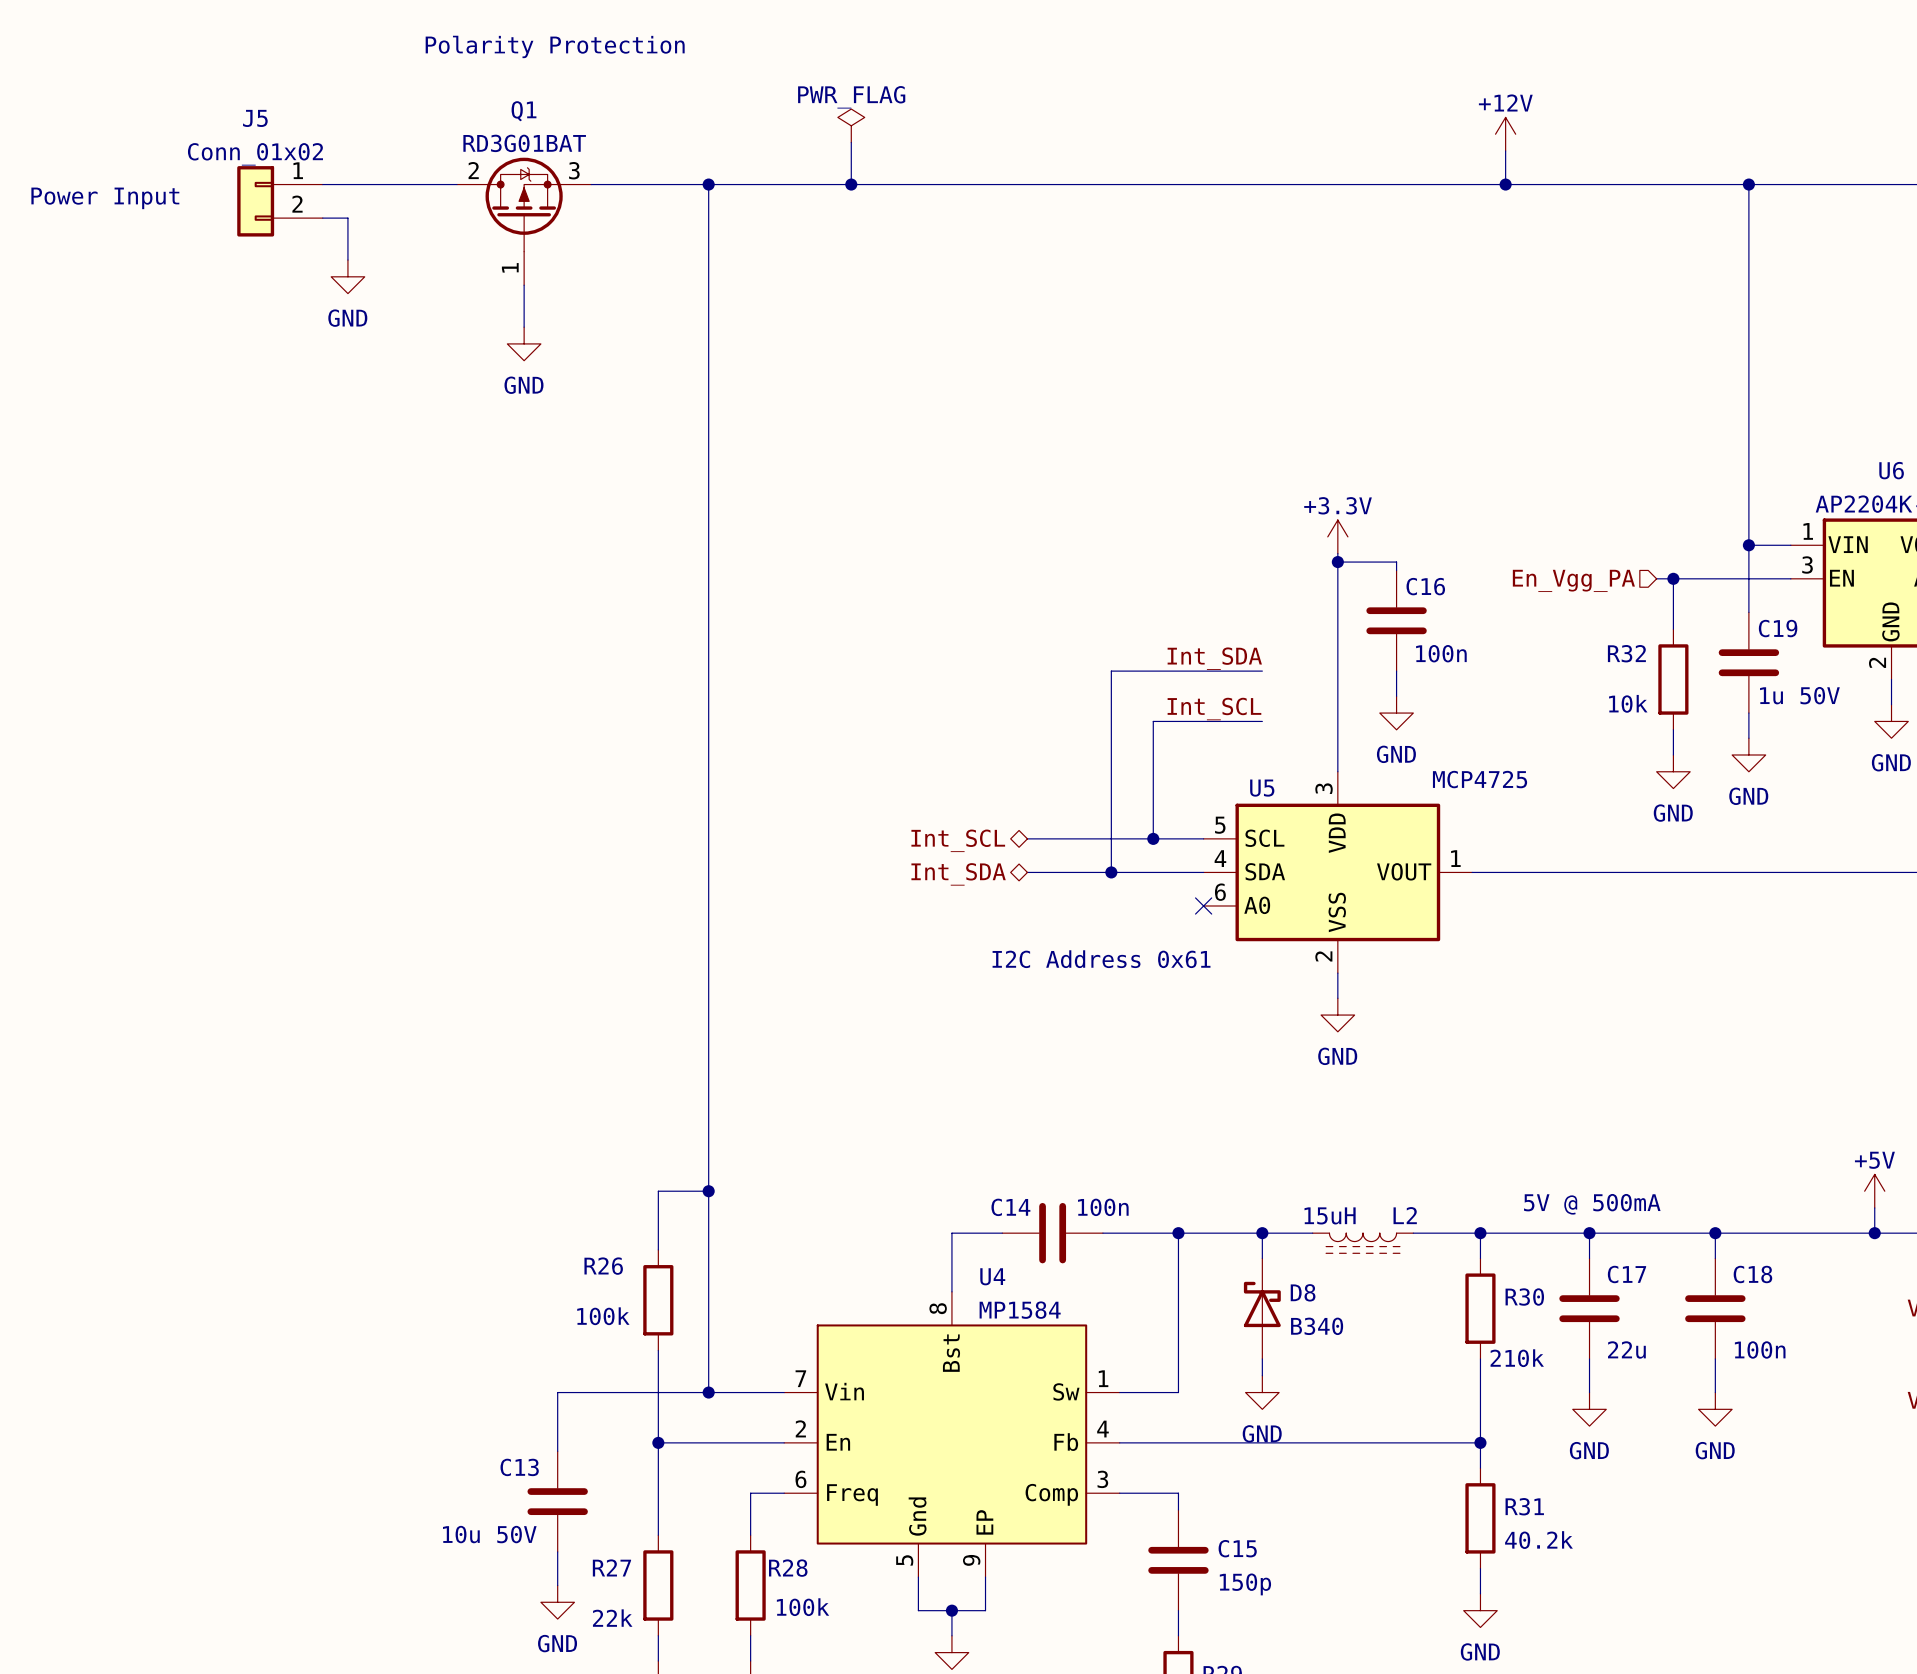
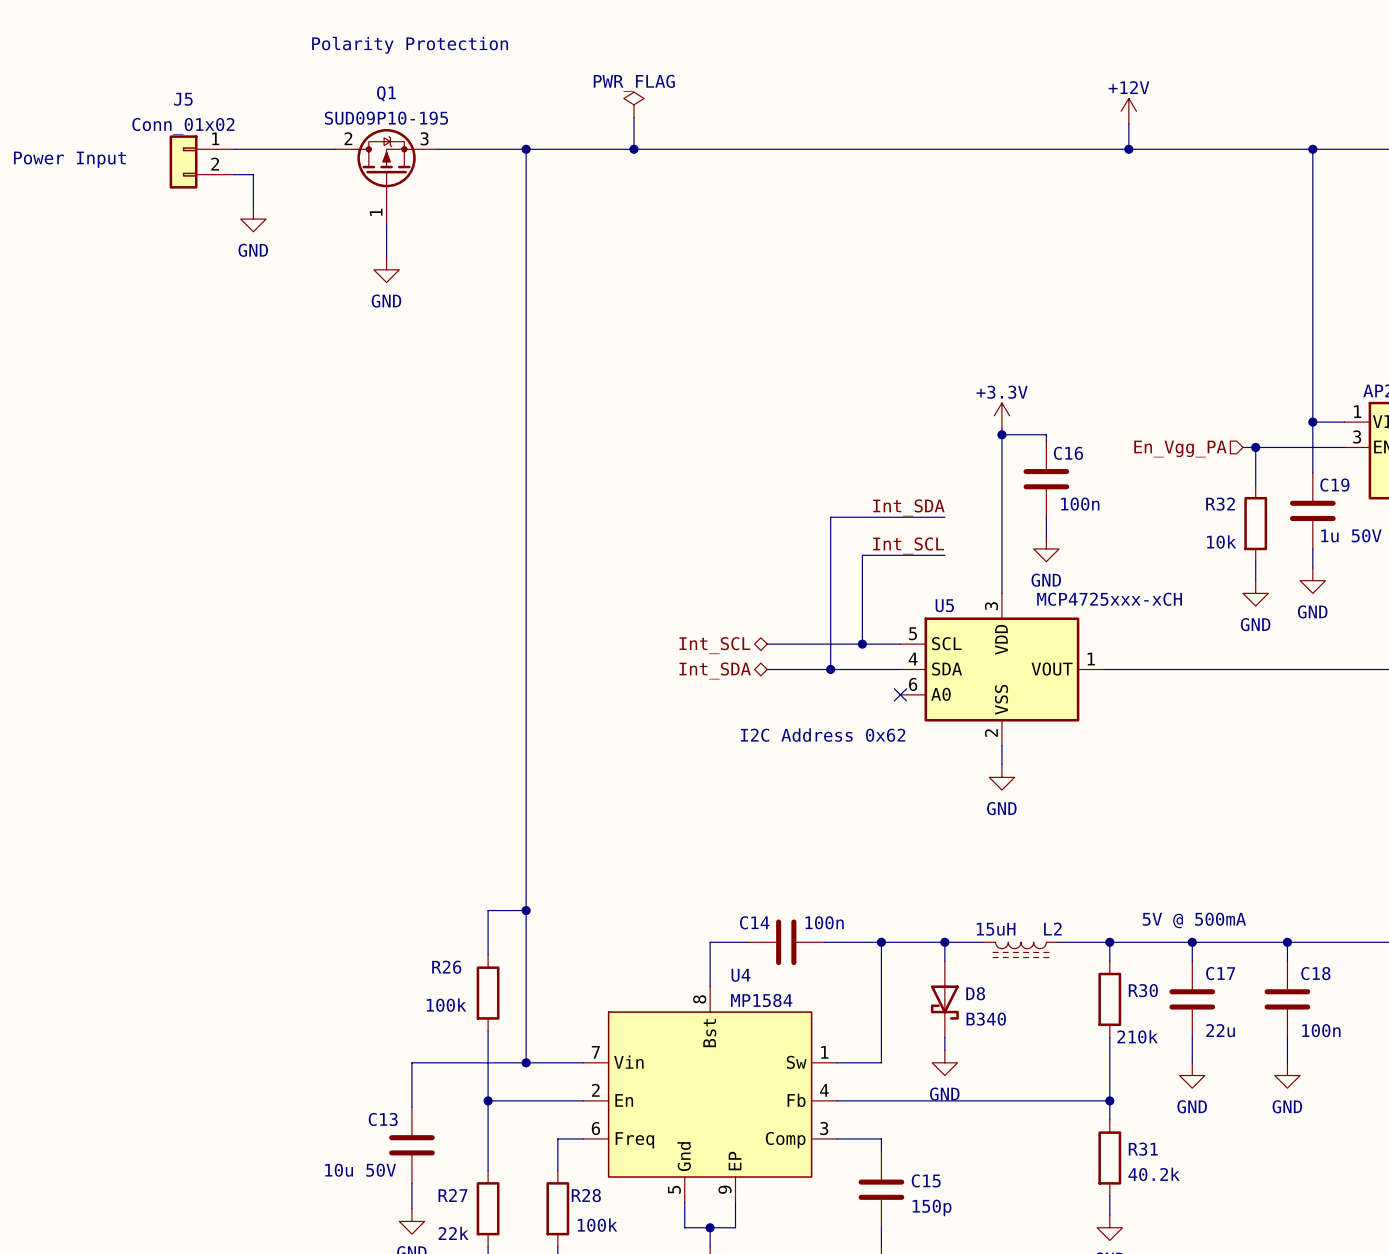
Q1 value: RD3G01BAT (524, 143) -> SUD09P10-195 (386, 118)
U5 value: MCP4725 (1480, 779) -> MCP4725xxx-xCH (1109, 599)
text: I2C Address 0x61 (1101, 959) -> I2C Address 0x62 (823, 735)
D8 rotation: 0° (1262, 1304) -> 180° (944, 1002)

